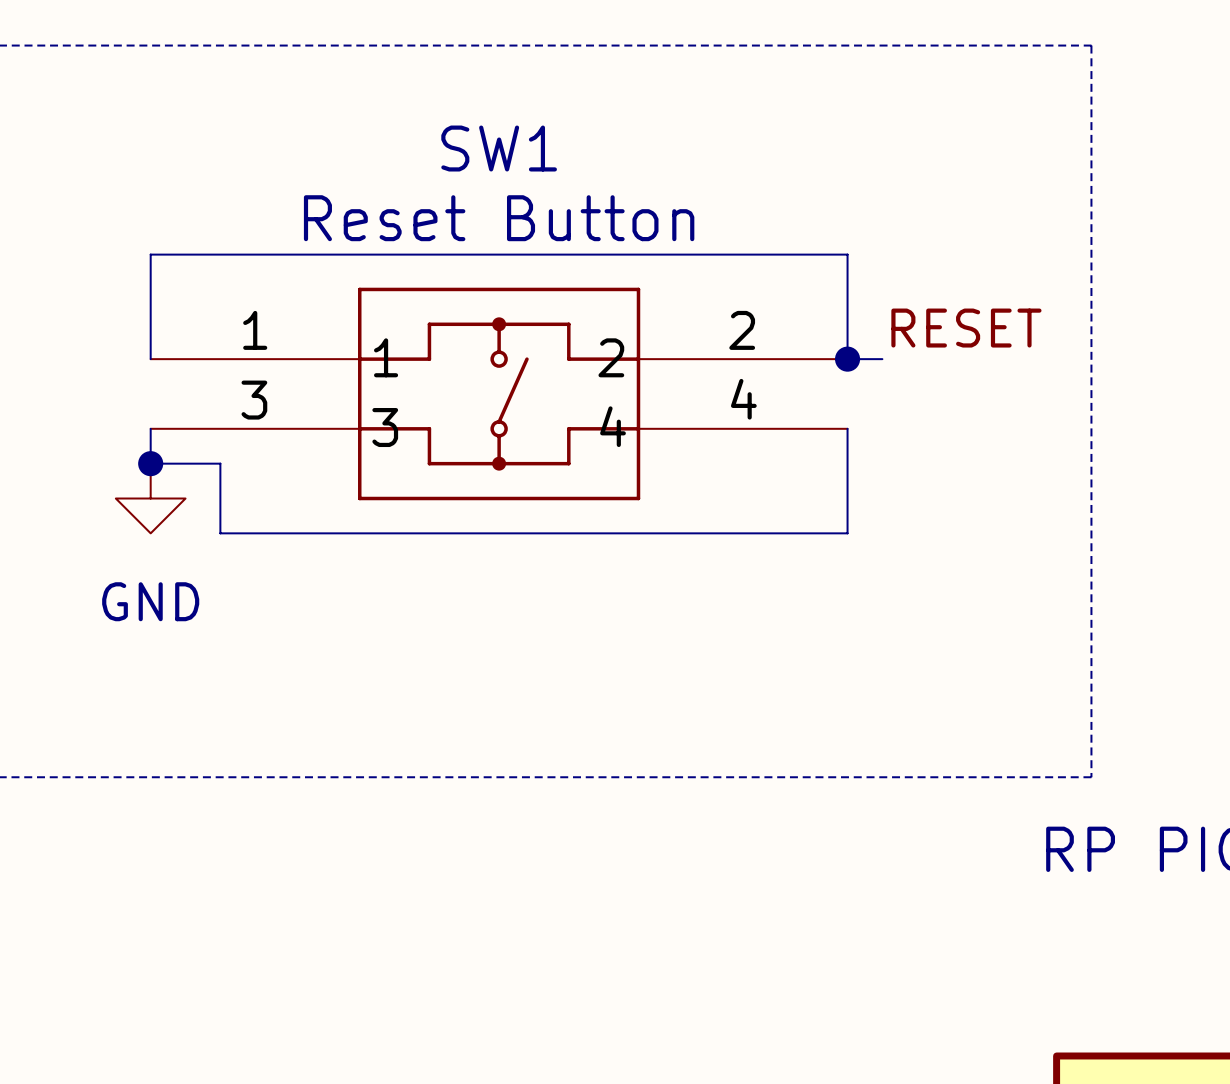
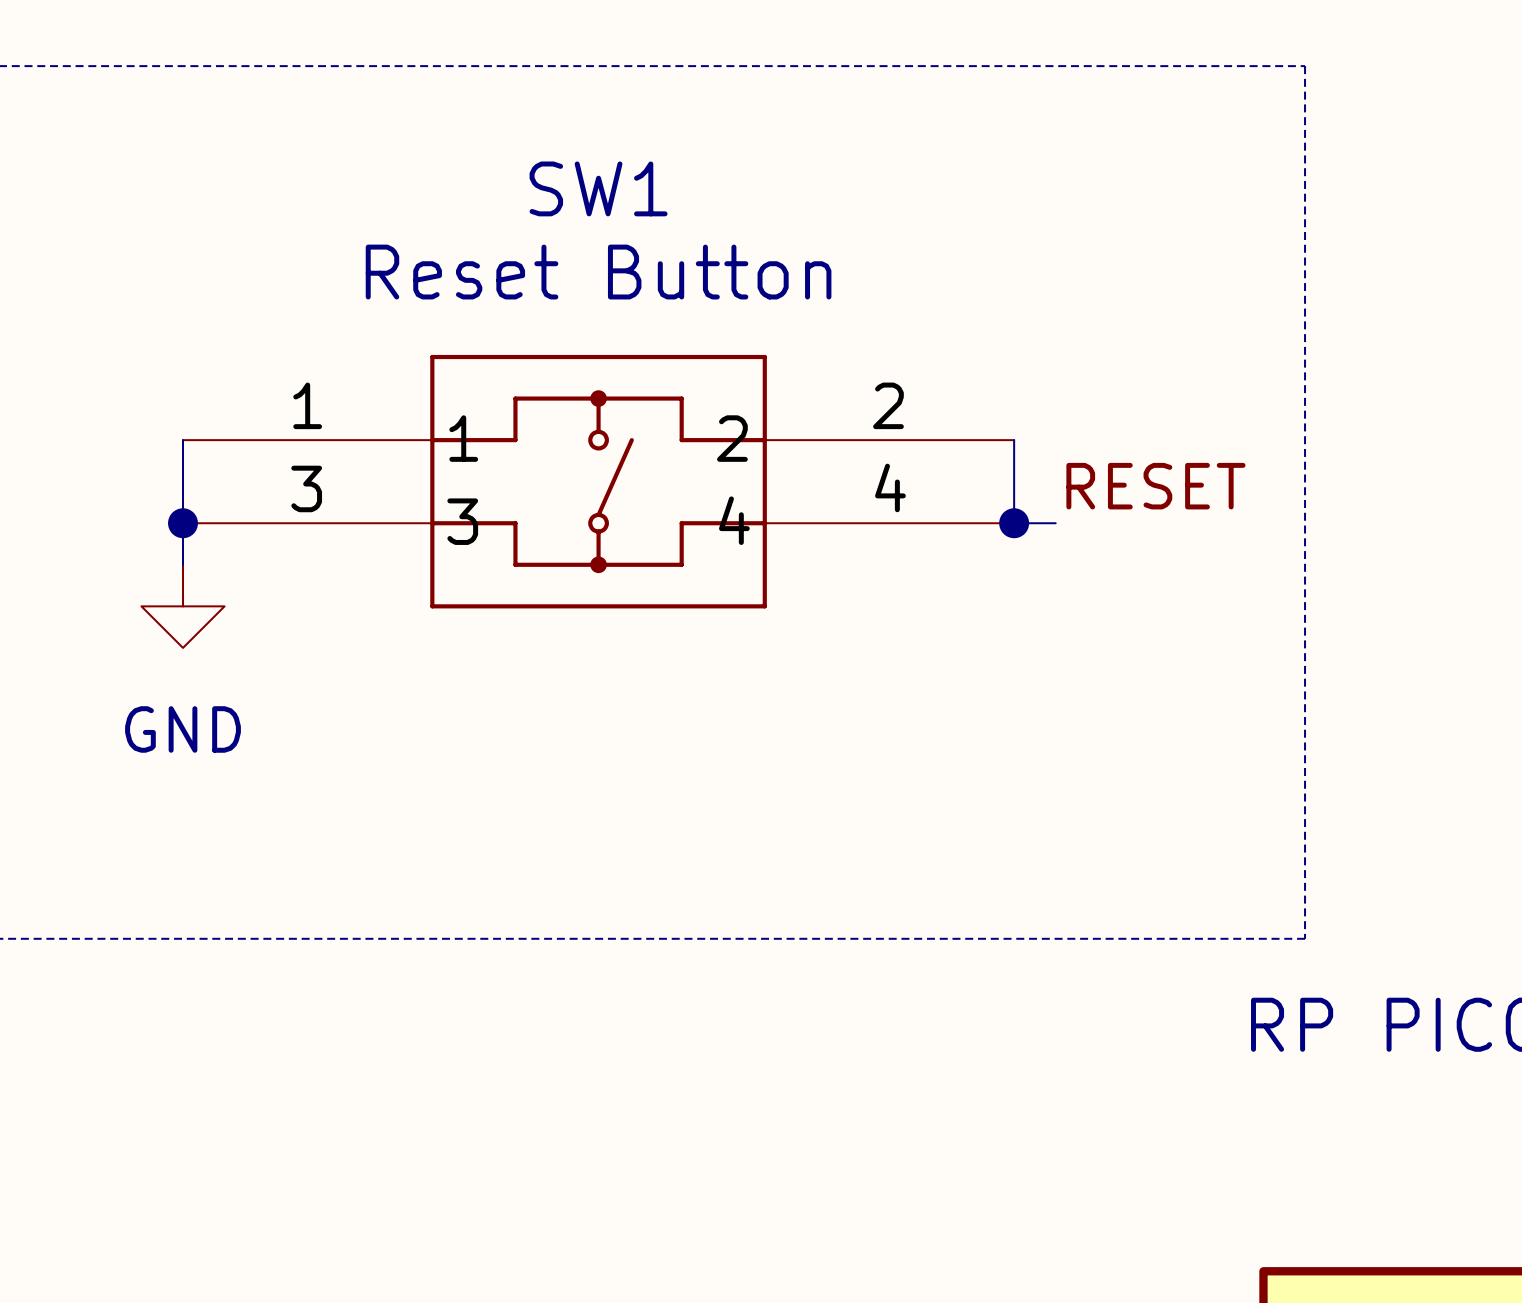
label position: RESET (966, 328) -> RESET (1155, 486)
wire: (150, 359) (150, 254) (847, 254) (847, 359) (882, 359) -> (183, 440) (183, 523)
wire: none -> (1014, 440) (1014, 523) (1055, 523)
junction position: (847, 359) -> (1014, 523)
wire: (847, 428) (847, 533) (220, 533) (220, 463) (150, 463) -> none
junction position: (150, 463) -> (183, 523)

